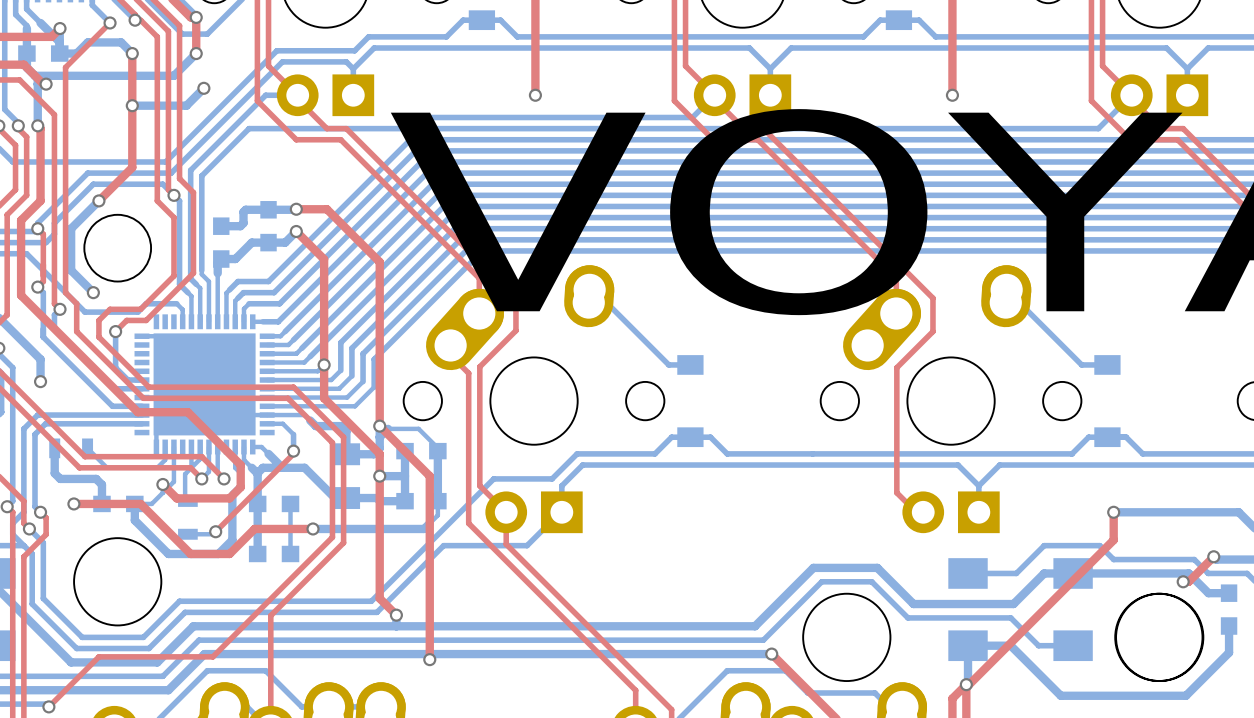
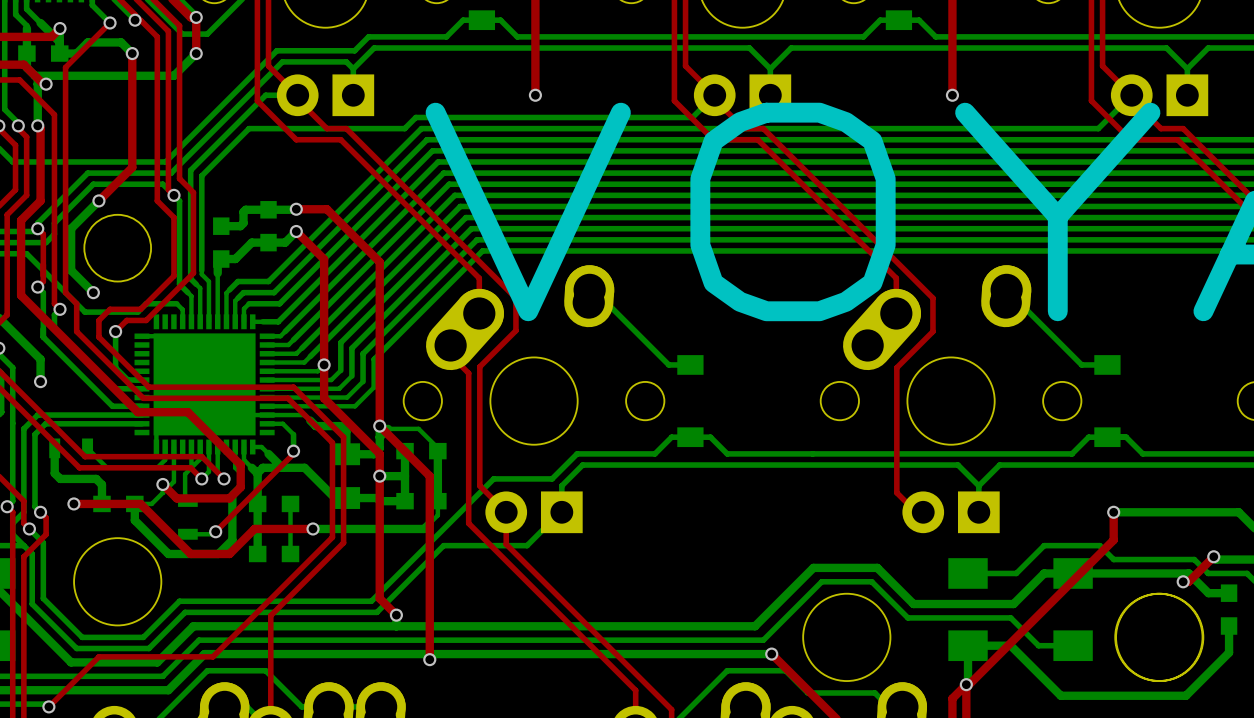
bottom track: (203, 88) (186, 105) (132, 105) -> none
via: (203, 88) -> none
via: (132, 105) -> none

